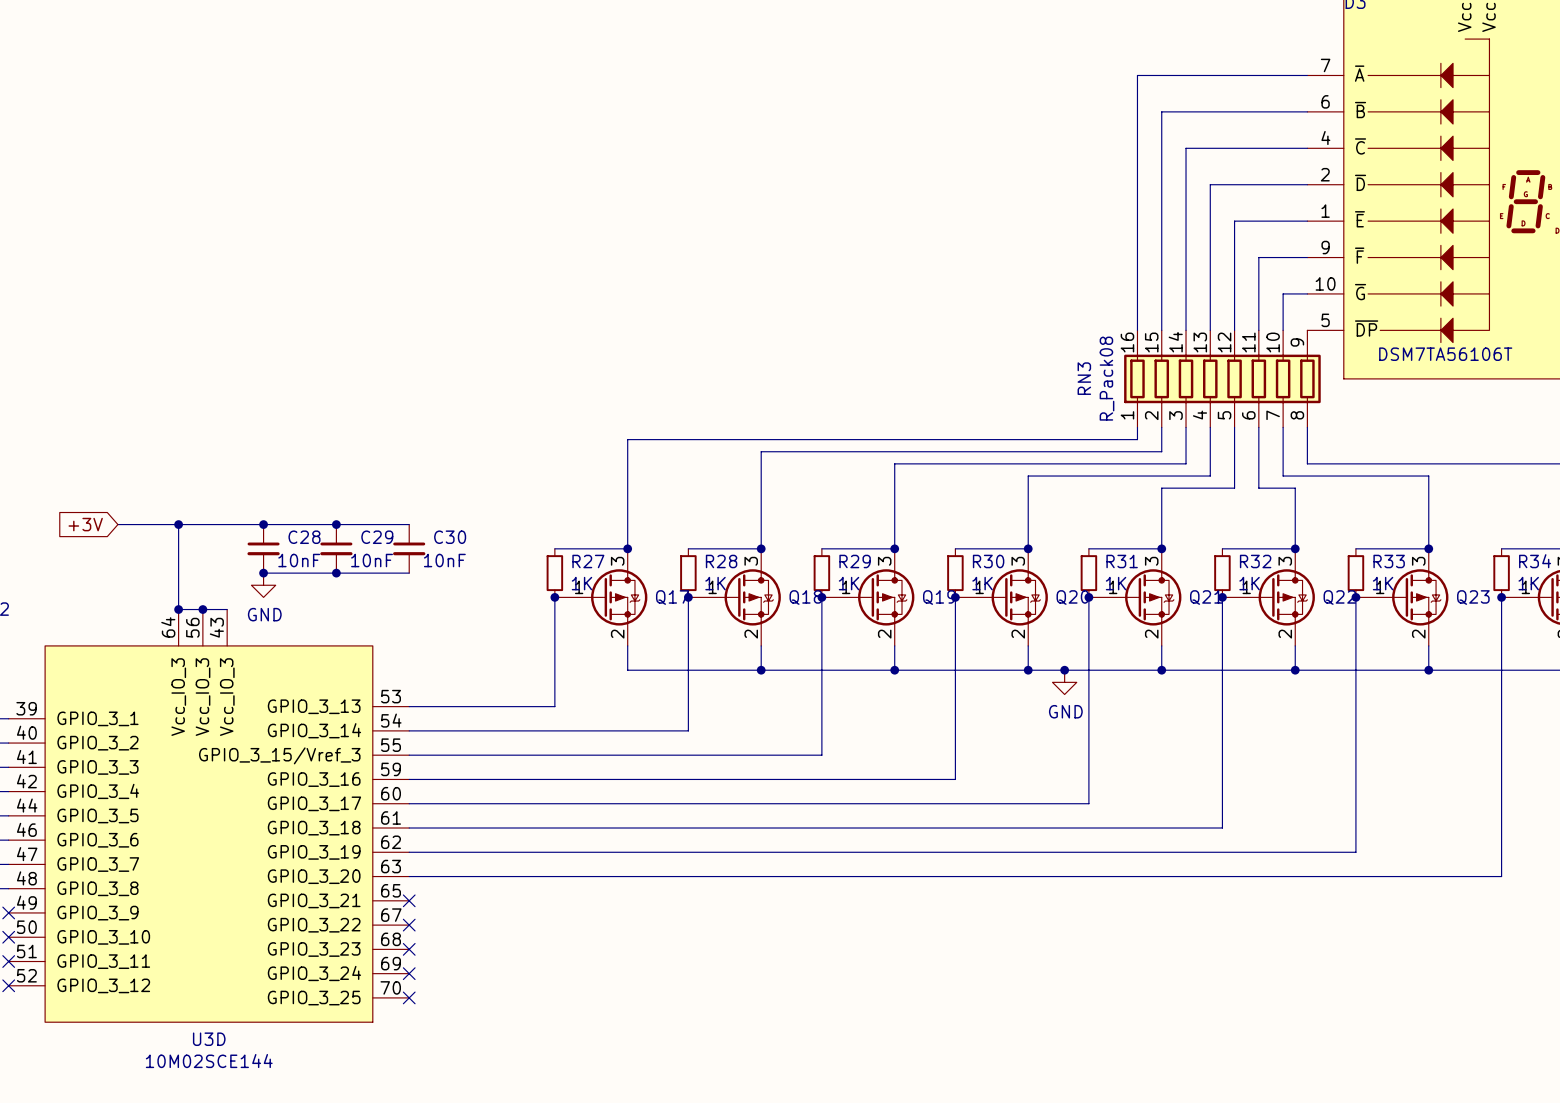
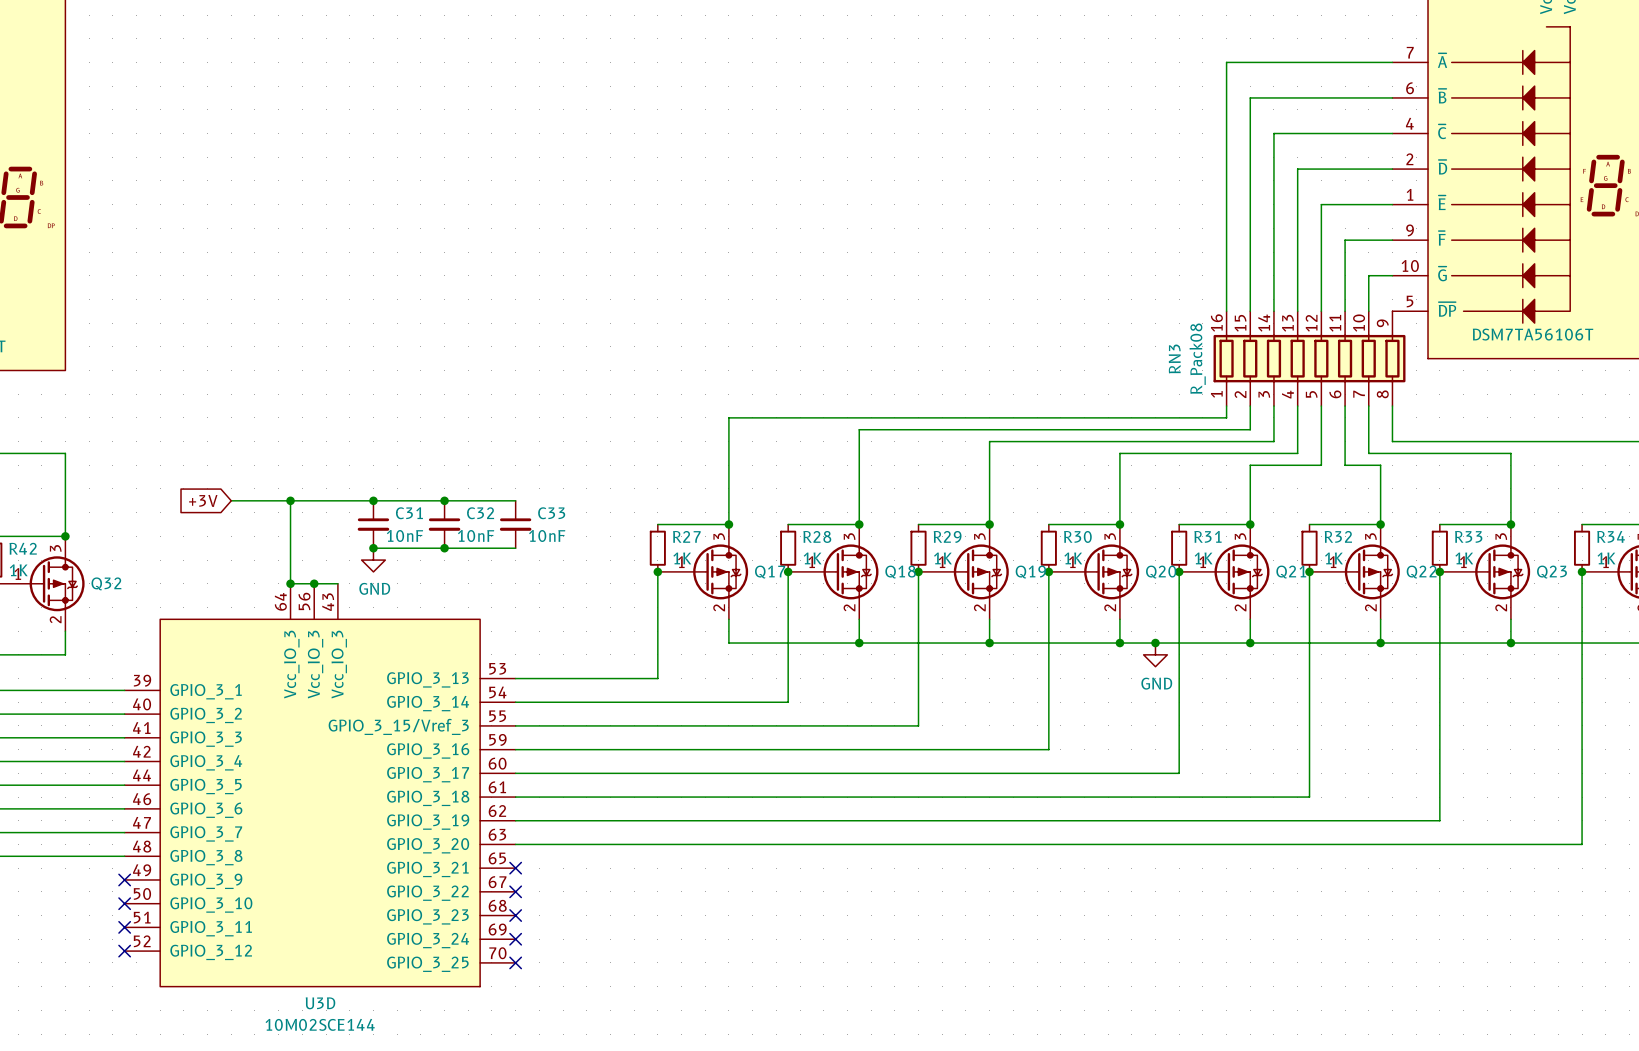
C28 name: C28 (304, 537) -> C31 (409, 513)
C29 name: C29 (377, 537) -> C32 (480, 513)
C30 name: C30 (450, 537) -> C33 (551, 513)

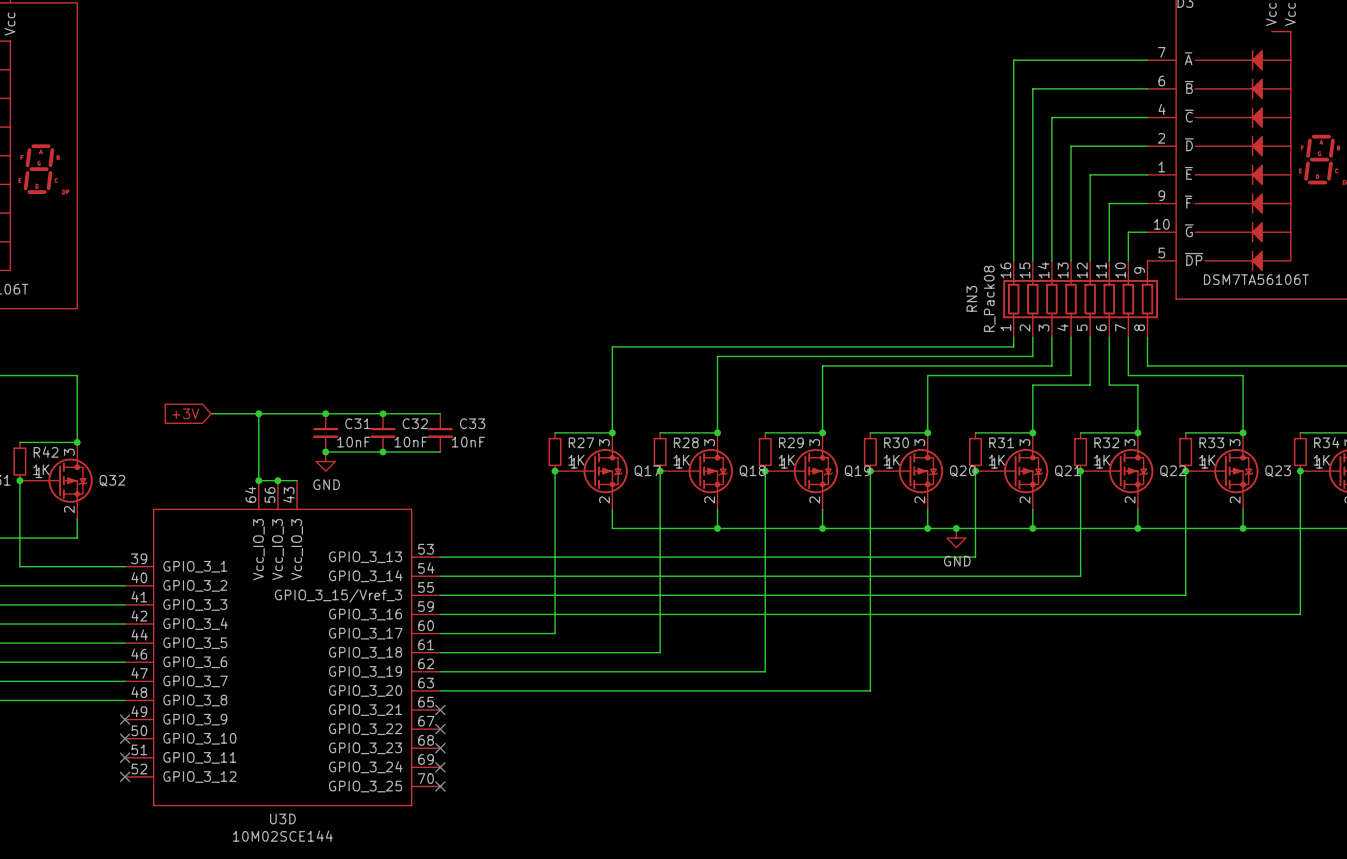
wire: (1179, 678) (1179, 773) (657, 773) -> (975, 557) (555, 557) (555, 633)
wire: (1309, 702) (1309, 797) (788, 797) -> (1080, 576) (660, 576) (660, 652)
wire: (1439, 725) (1439, 820) (918, 820) -> (1185, 595) (765, 595) (765, 671)
wire: (1582, 749) (1582, 844) (1048, 844) -> (1300, 614) (870, 614) (870, 690)

